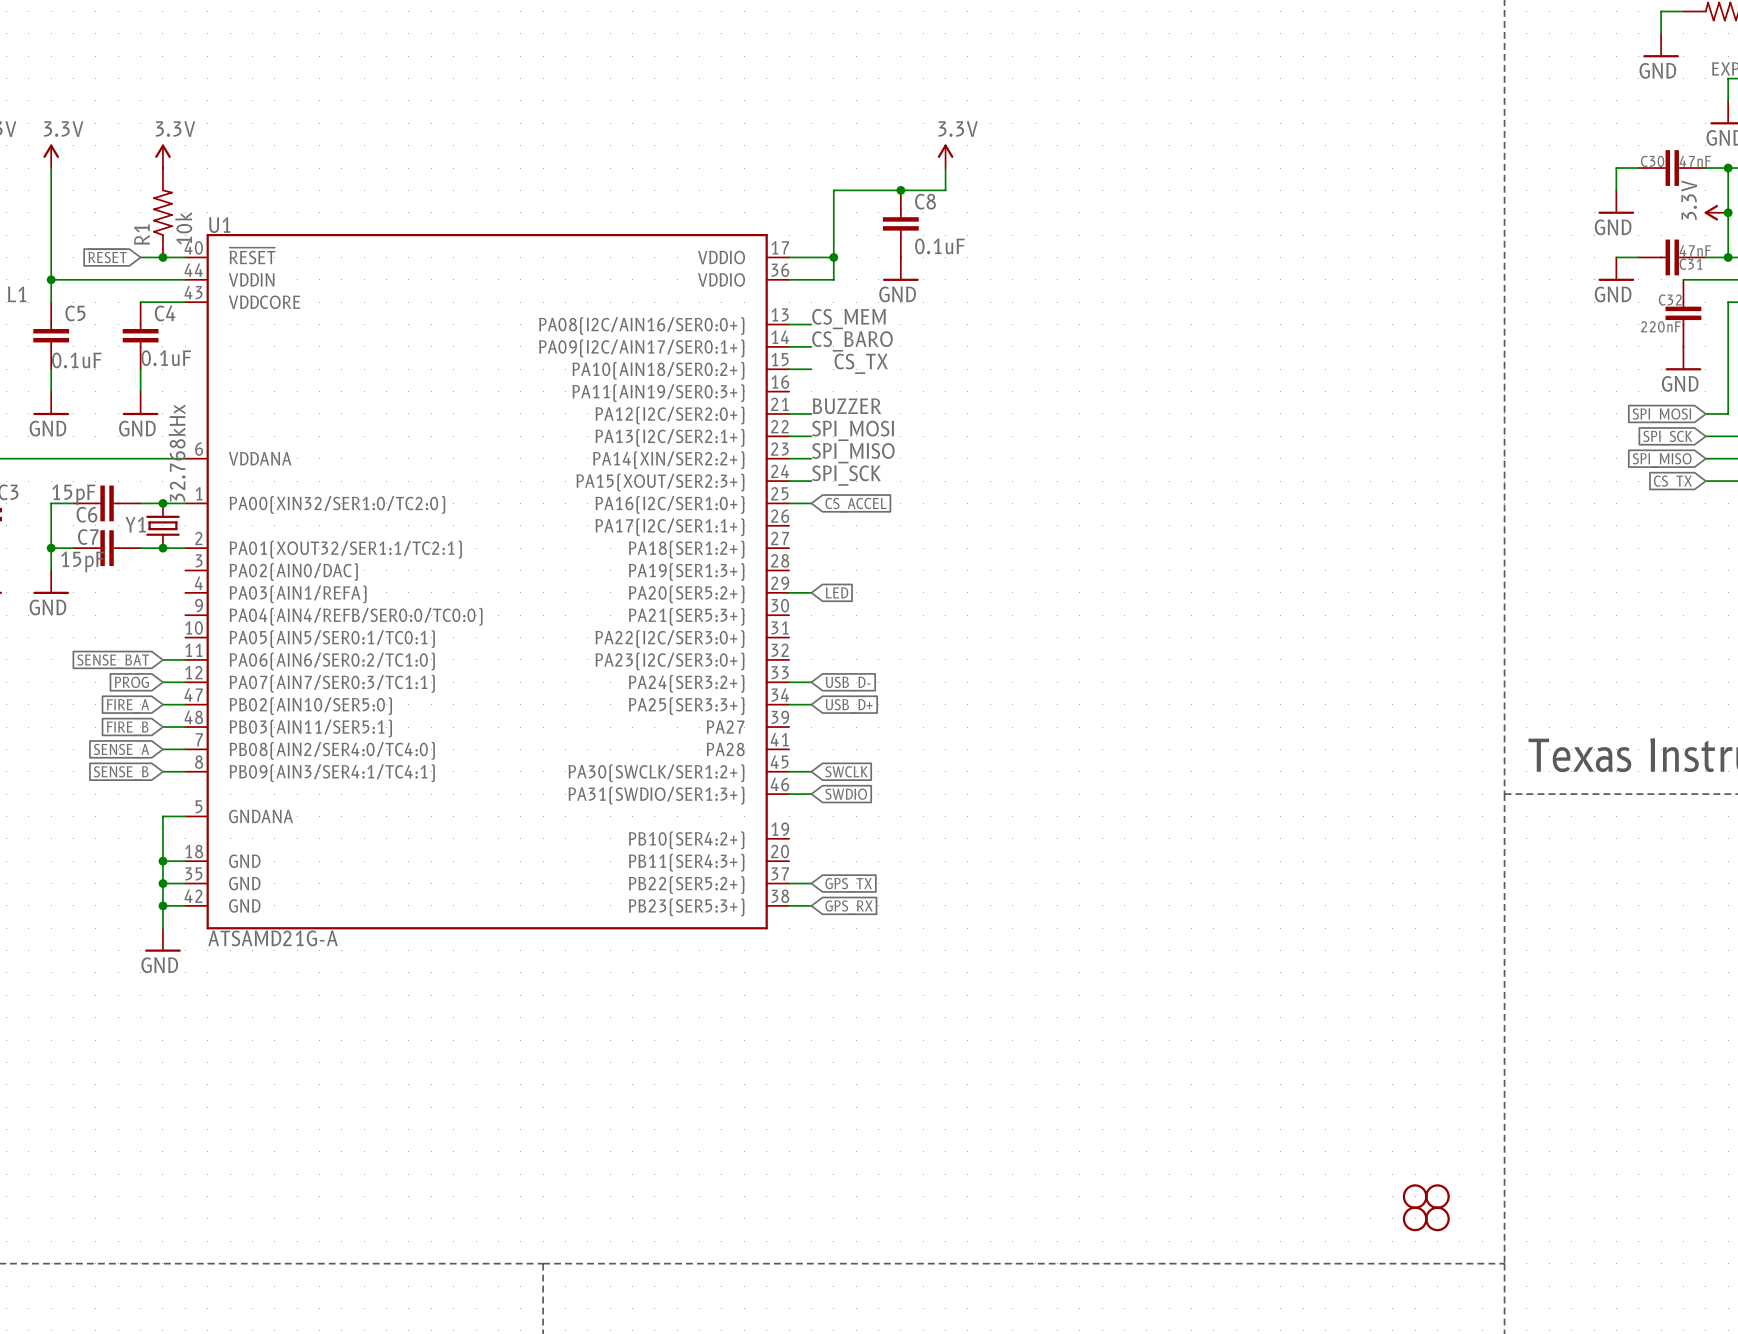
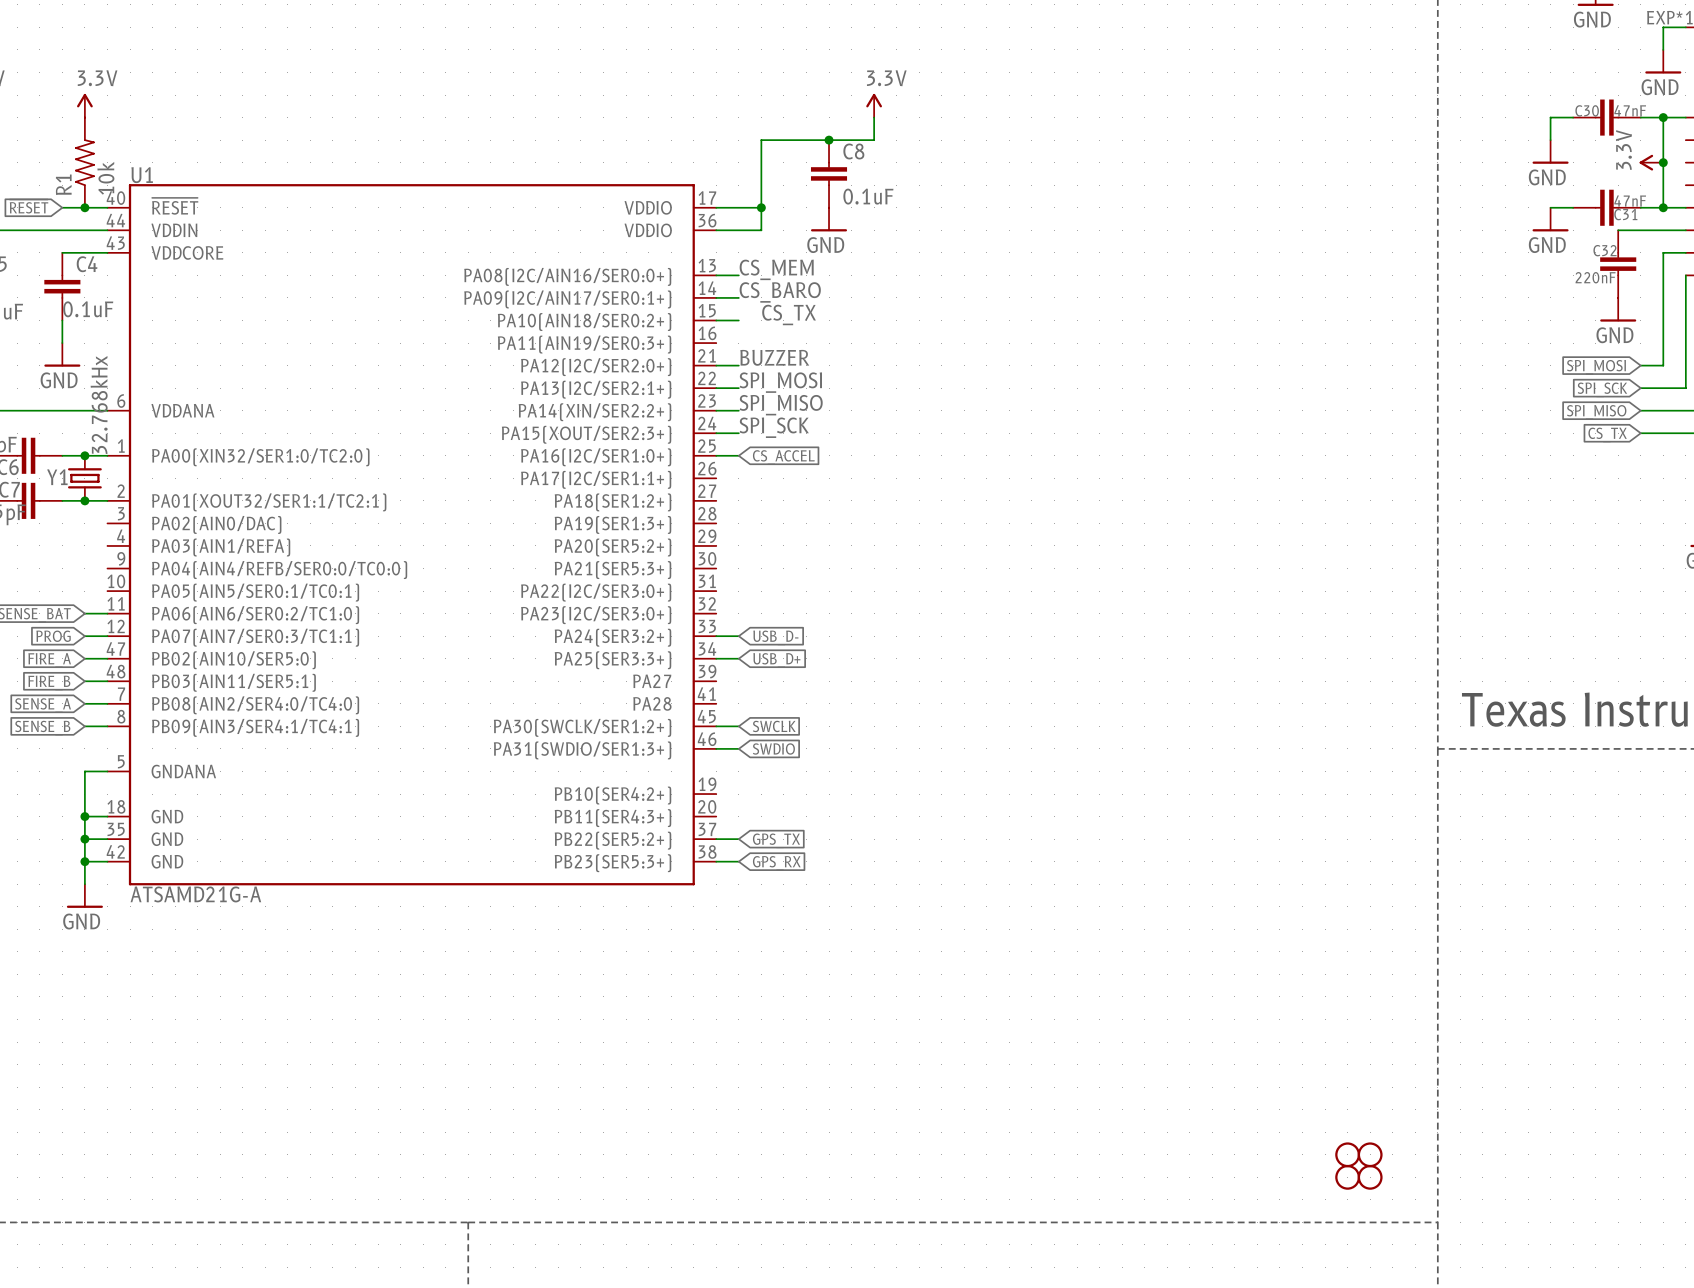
wire: (789, 592) (811, 592) -> none
global label: LED (837, 592) -> none

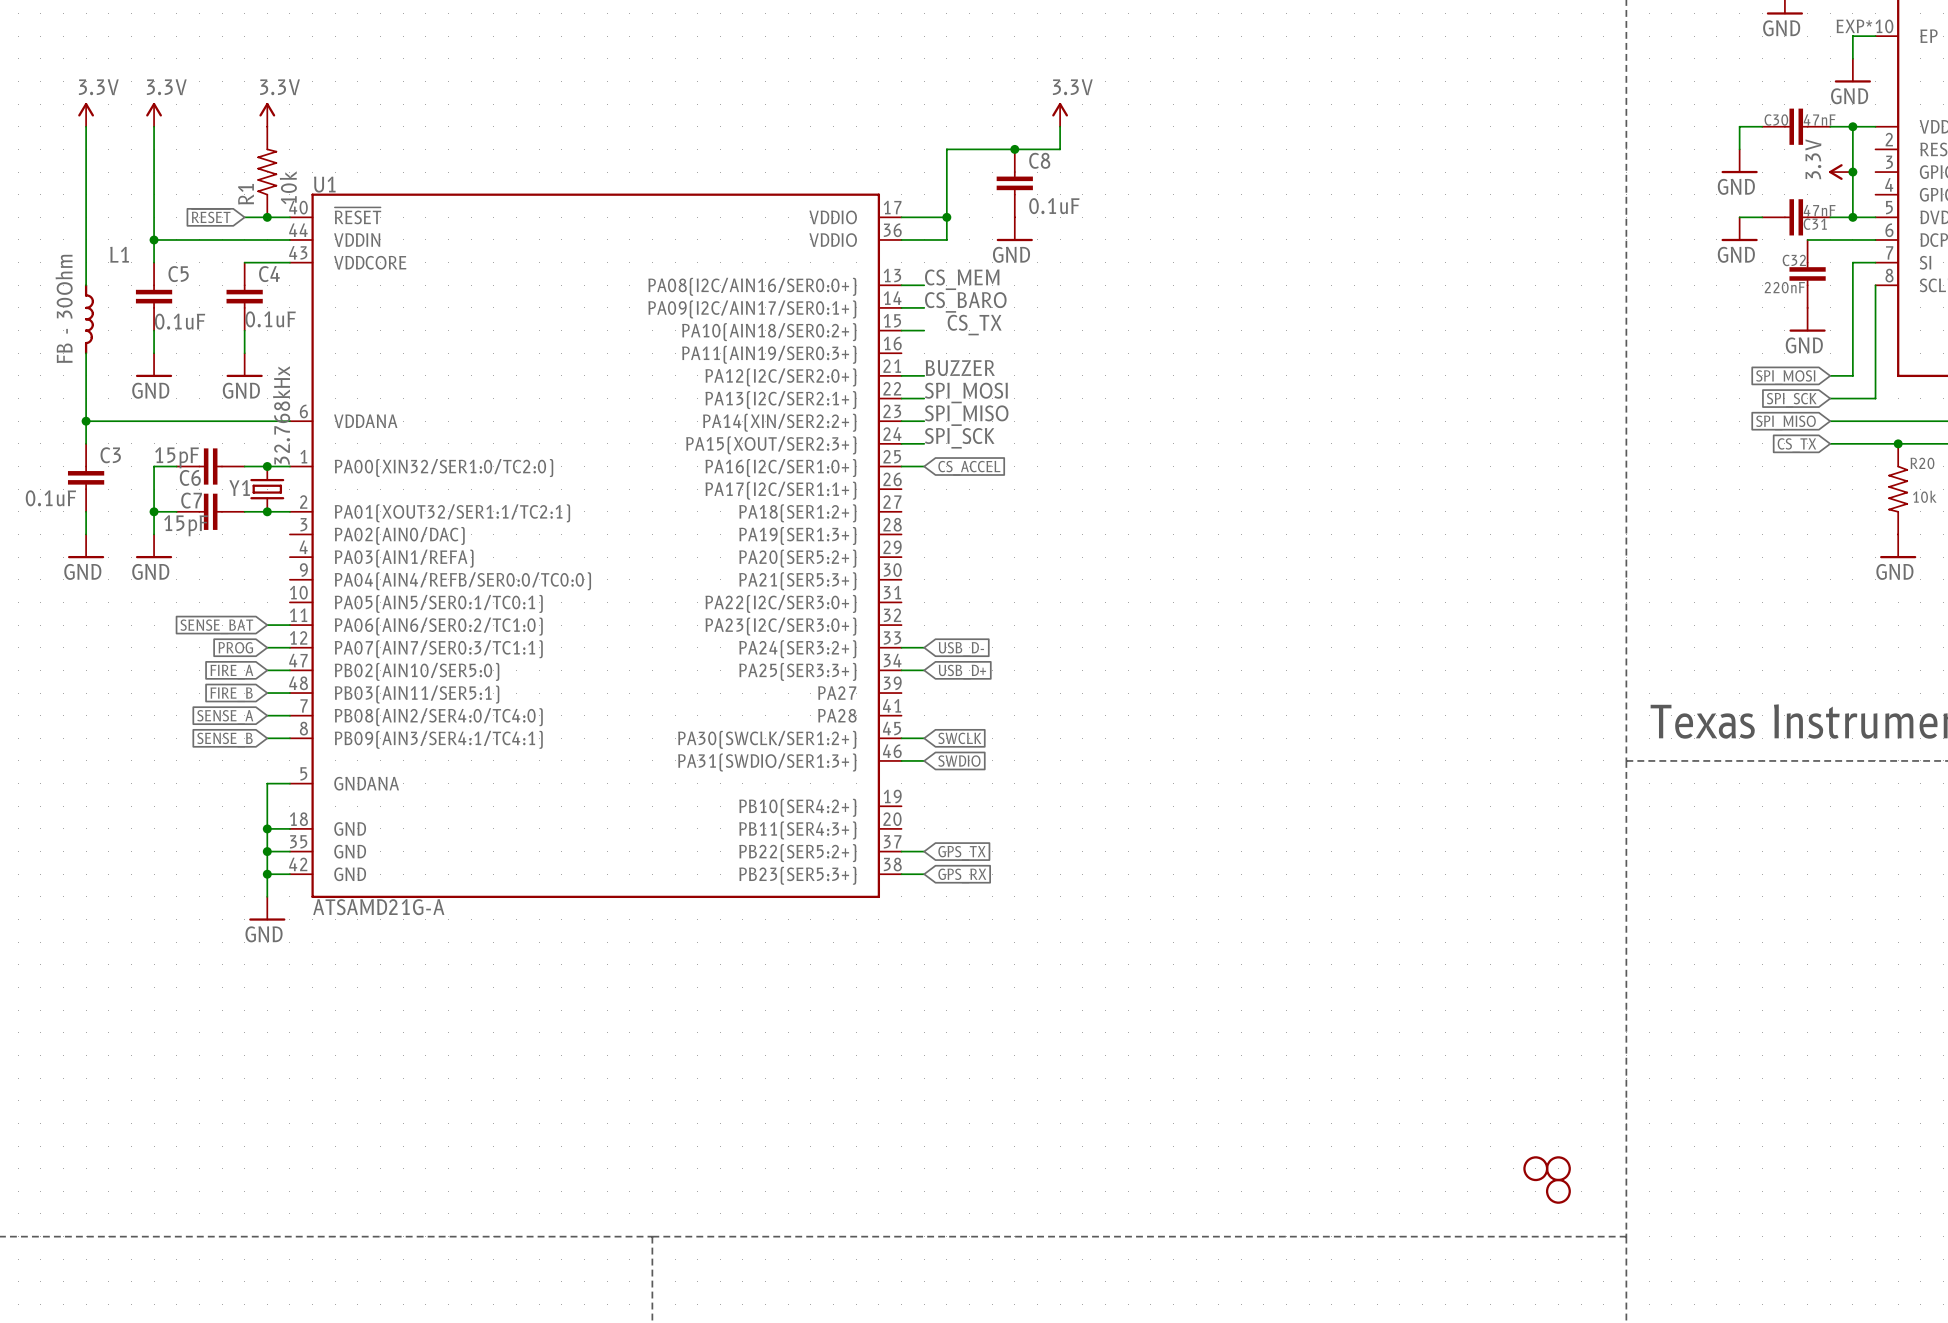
part: (1347, 1177) -> none

